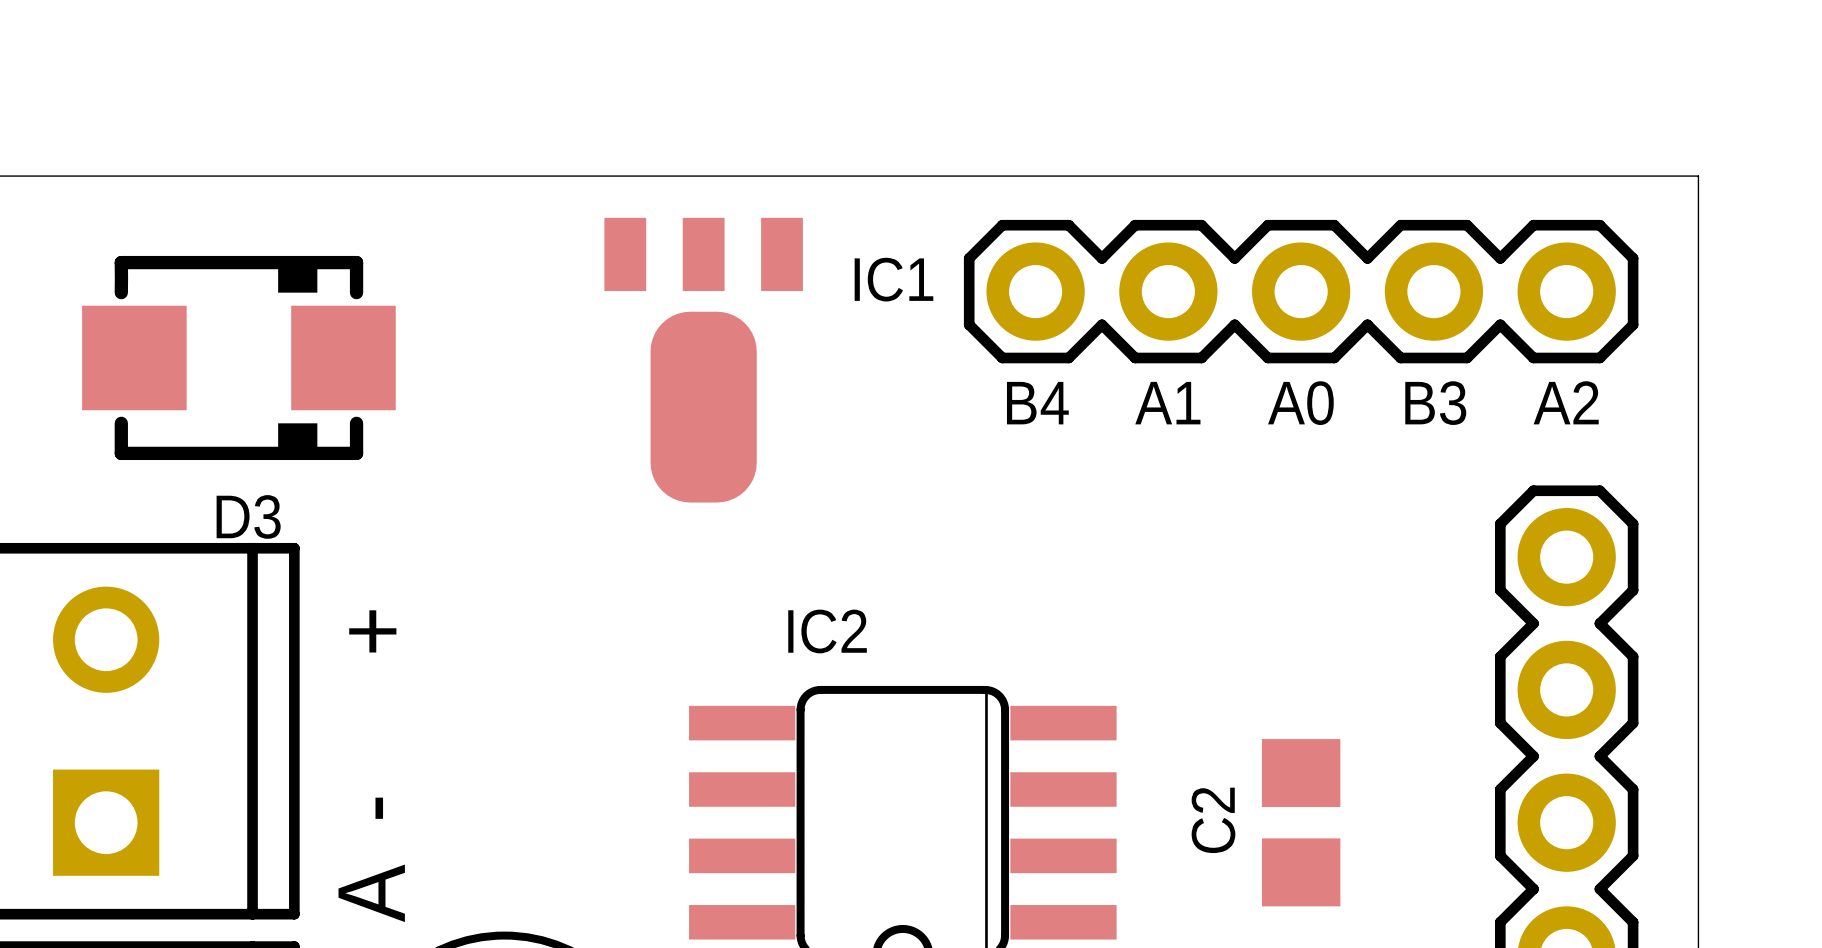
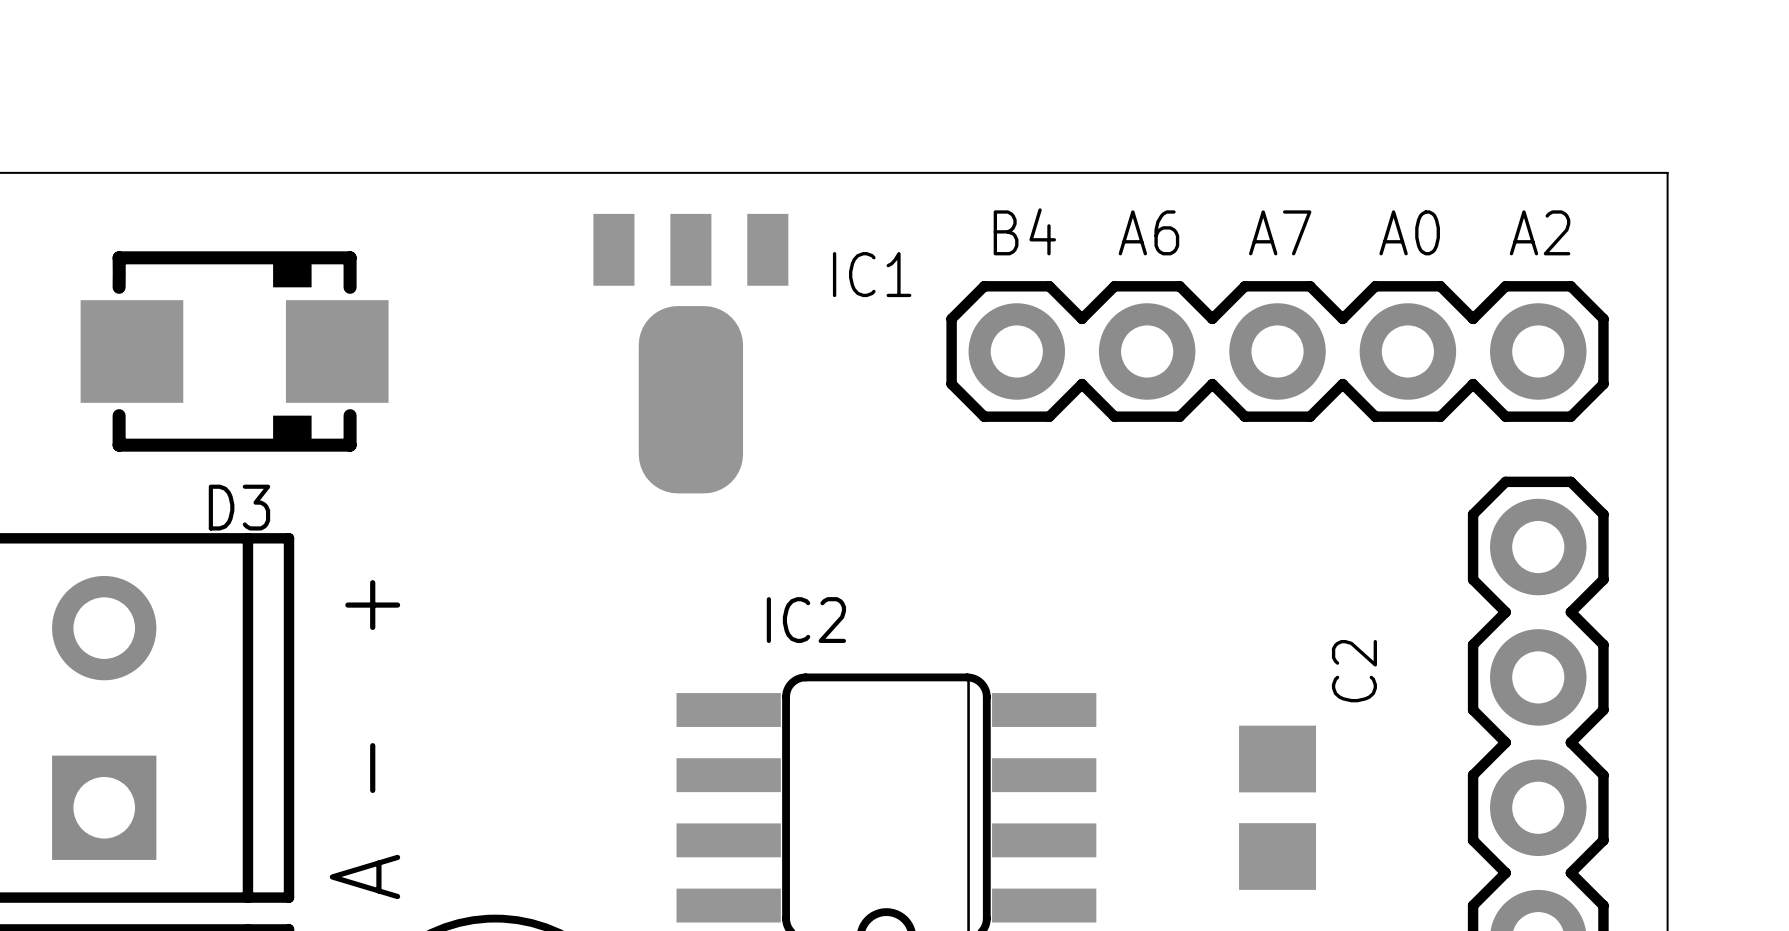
text: none -> A6 (1148, 232)
text: none -> A7 (1280, 232)
part position: (1301, 291) -> (1277, 351)
text position: A2 (1566, 402) -> A2 (1540, 232)
text position: B4 (1037, 403) -> B4 (1024, 231)
text: A1 (1167, 403) -> none
text position: A0 (1300, 403) -> A0 (1409, 232)
text: B3 (1435, 403) -> none
C2 name position: C2 (1213, 820) -> C2 (1354, 671)

